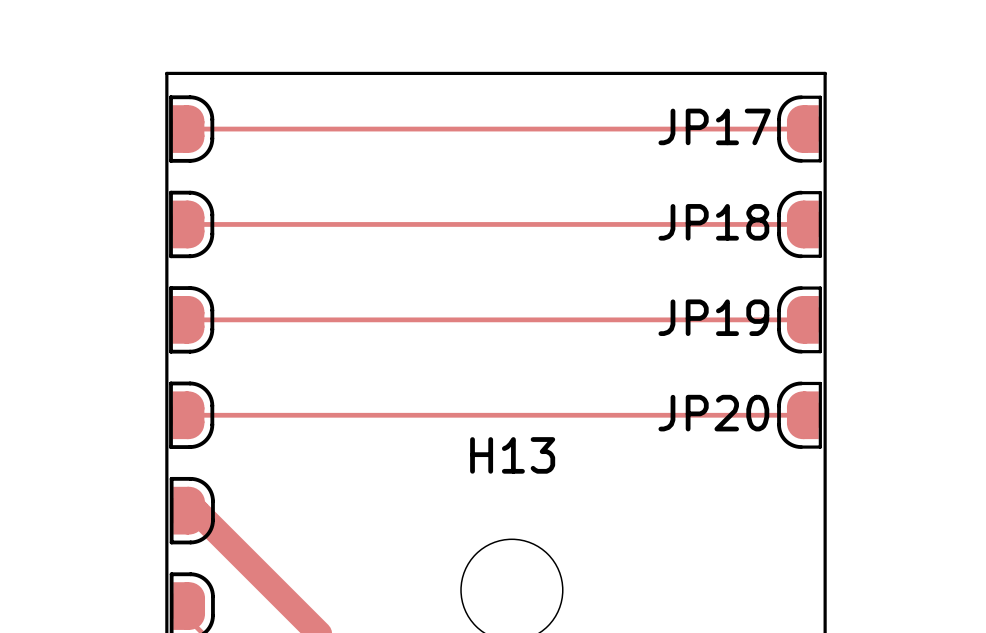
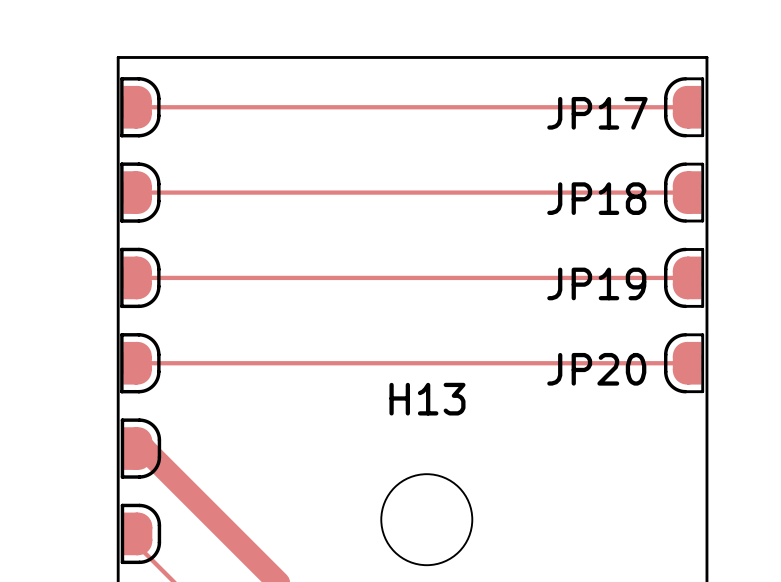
JP17 name: JP17 (714, 126) -> none
text: none -> JP17 (597, 113)
JP18 name: JP18 (713, 222) -> none
text: none -> JP18 (596, 198)
JP19 name: JP19 (713, 317) -> none
text: none -> JP19 (596, 283)
JP20 name: JP20 (713, 413) -> none
text: none -> JP20 (596, 369)

